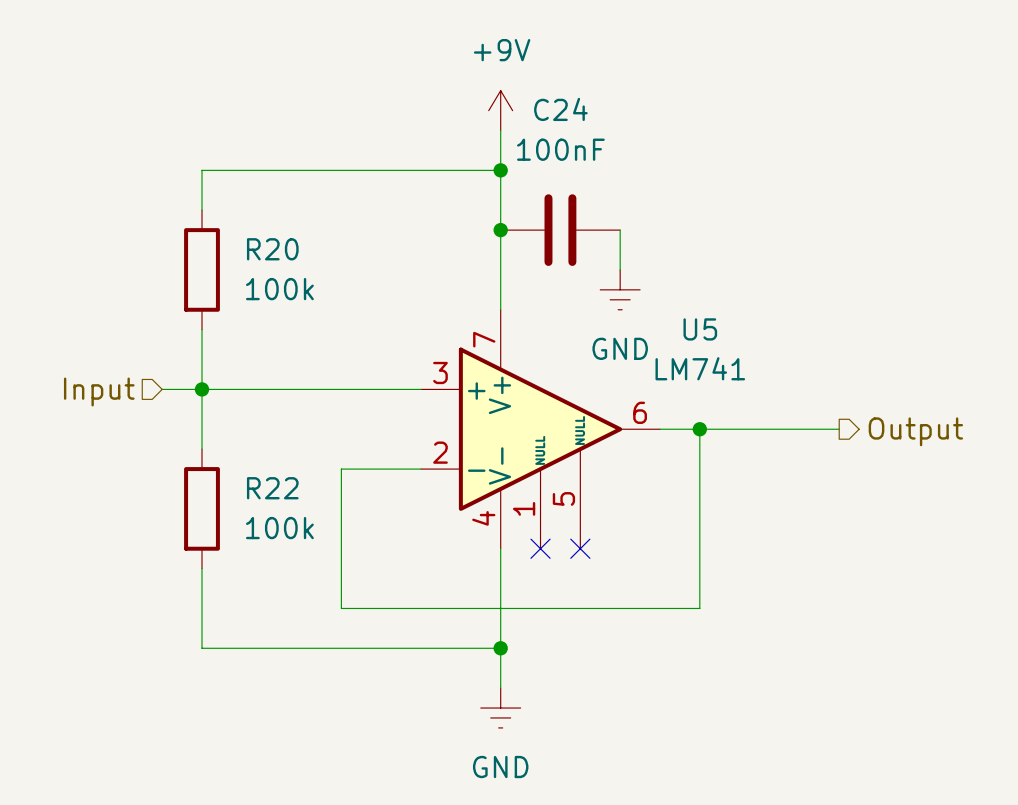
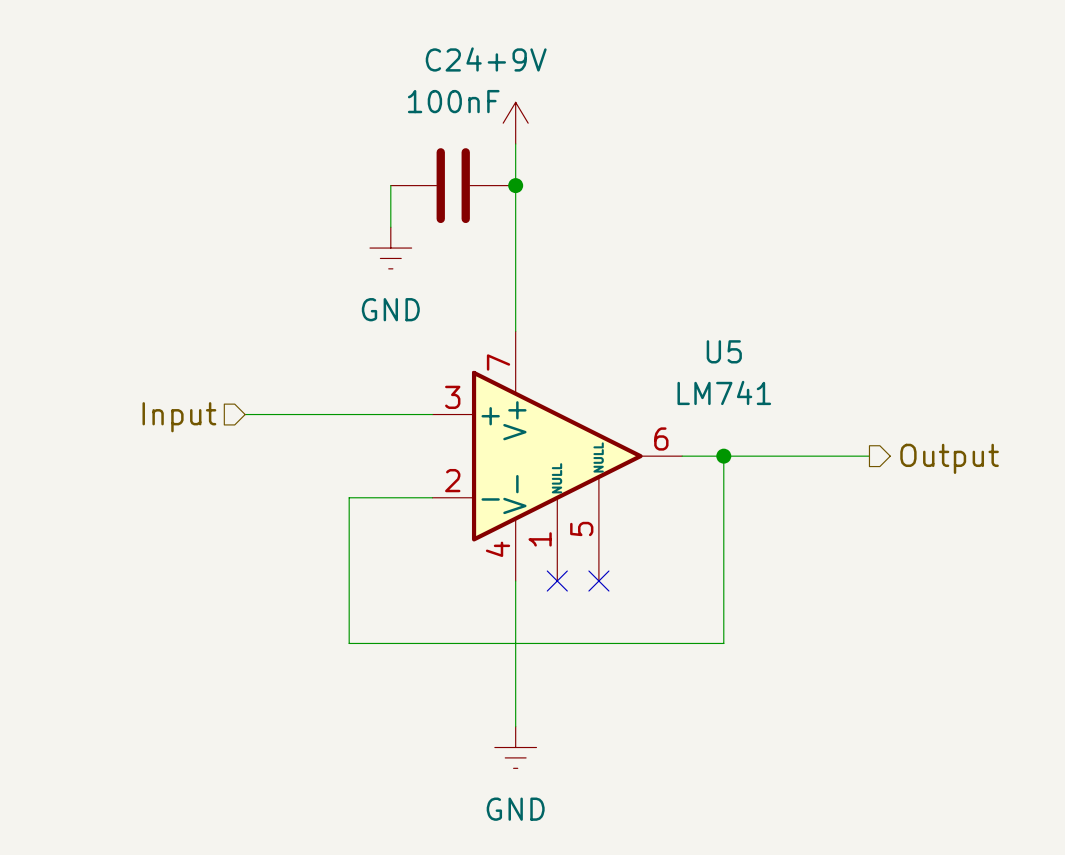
wire: (500, 170) (202, 170) (202, 210) -> none
junction: (500, 230) -> none
C24 position: (560, 230) -> (453, 185)
wire: (620, 230) (620, 269) -> (390, 185) (390, 227)
R20: 100k (202, 269) -> none
power symbol position: GND (620, 289) -> GND (390, 248)
wire: (202, 329) (202, 449) -> none
wire: (162, 389) (241, 389) -> none
junction: (202, 389) -> none
hierarchical label position: Input (99, 391) -> Input (179, 417)
R22: 100k (202, 508) -> none
wire: (202, 568) (202, 648) (500, 648) -> none
junction: (500, 648) -> none

